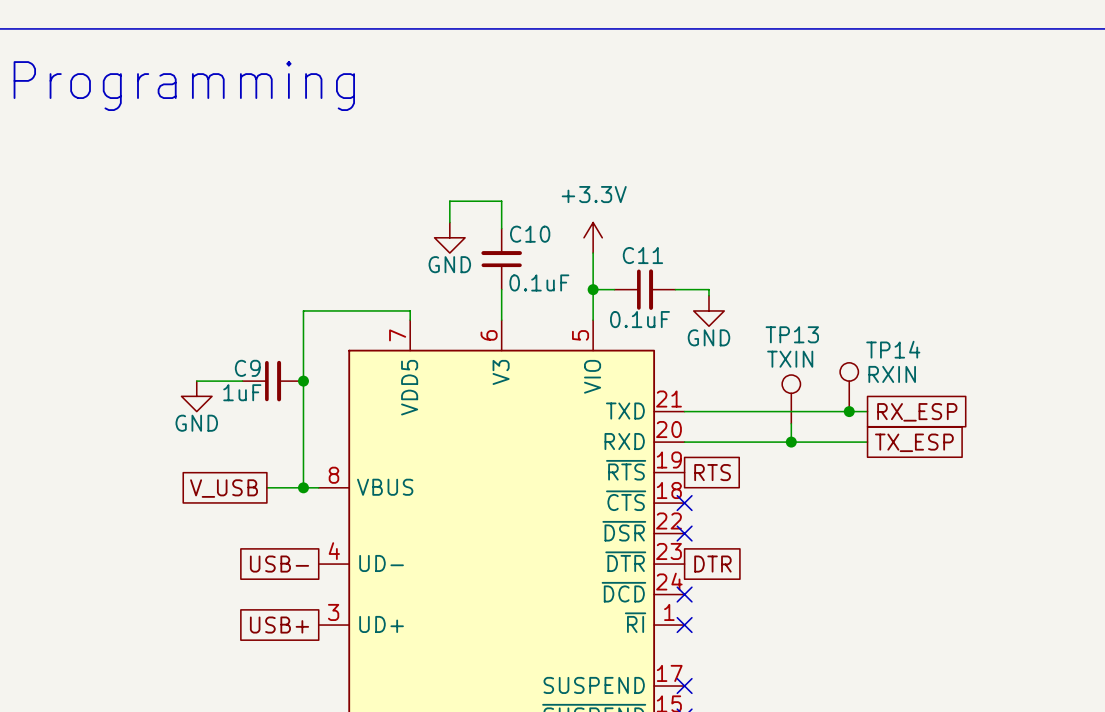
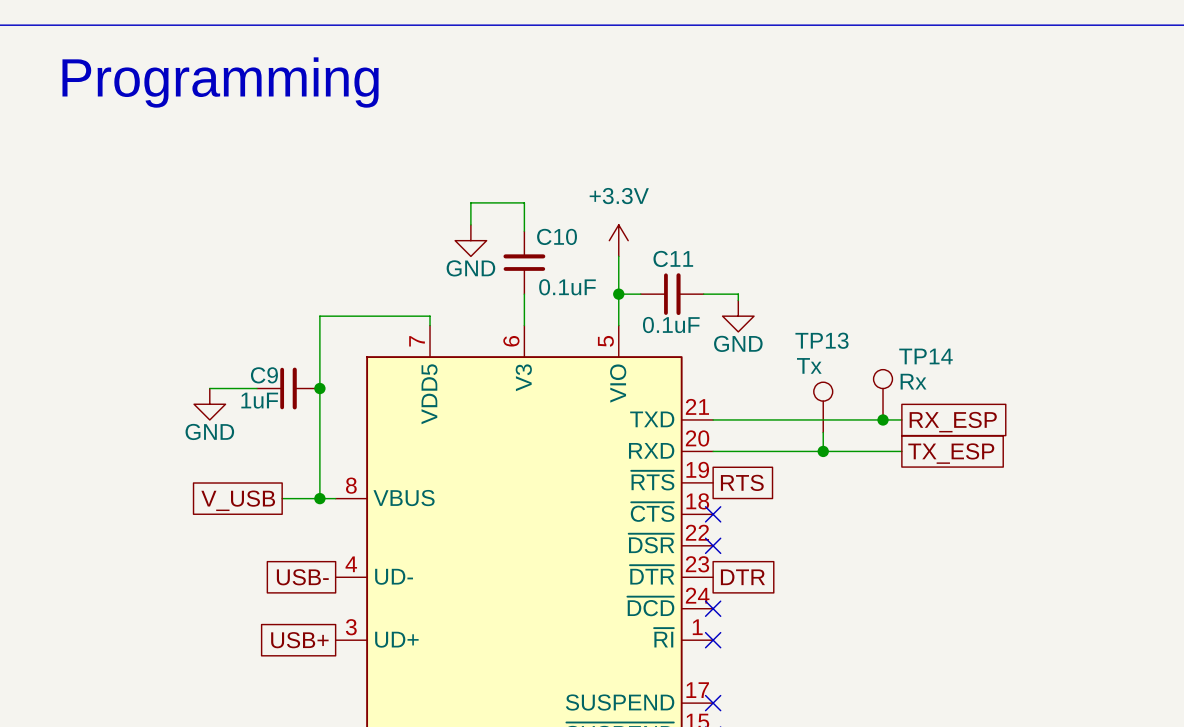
TP13 value: TXIN (790, 359) -> Tx (809, 365)
TP14 value: RXIN (892, 374) -> Rx (913, 381)

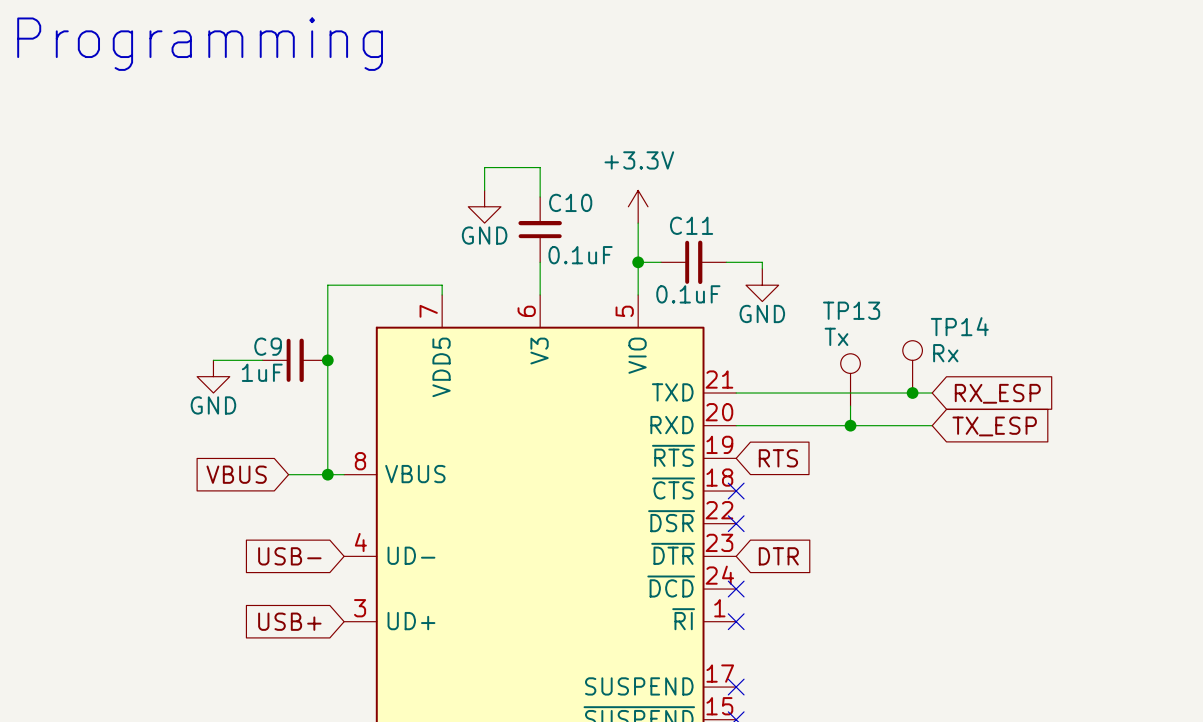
global label shape: passive (953, 422) -> input (997, 393)
global label shape: passive (951, 453) -> input (994, 426)
global label shape: passive (742, 482) -> input (778, 458)
global label shape: passive (238, 500) -> input (236, 474)
global label: V_USB (238, 500) -> VBUS (236, 474)
global label shape: passive (302, 577) -> input (289, 556)
global label shape: passive (742, 577) -> input (778, 556)
global label shape: passive (299, 640) -> input (289, 621)

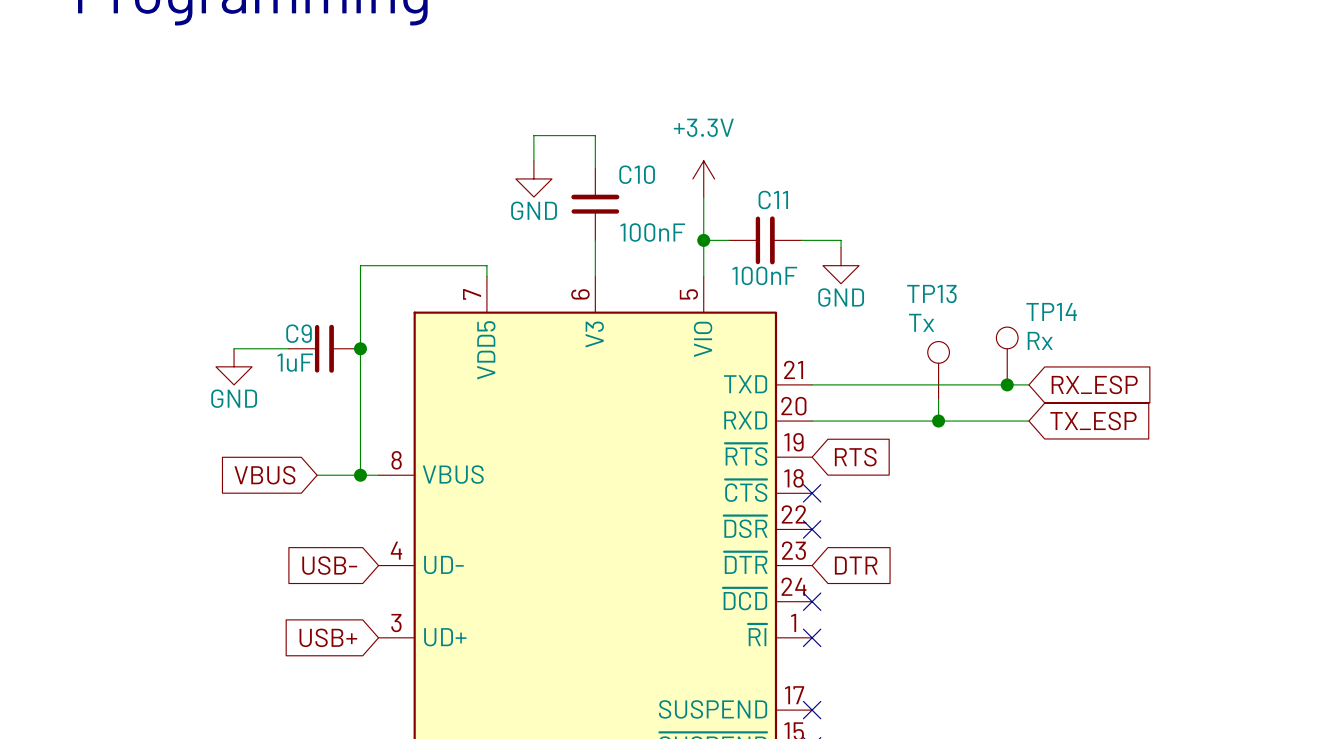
C10 value: 0.1uF (580, 255) -> 100nF (652, 232)
C11 value: 0.1uF (688, 294) -> 100nF (764, 275)

